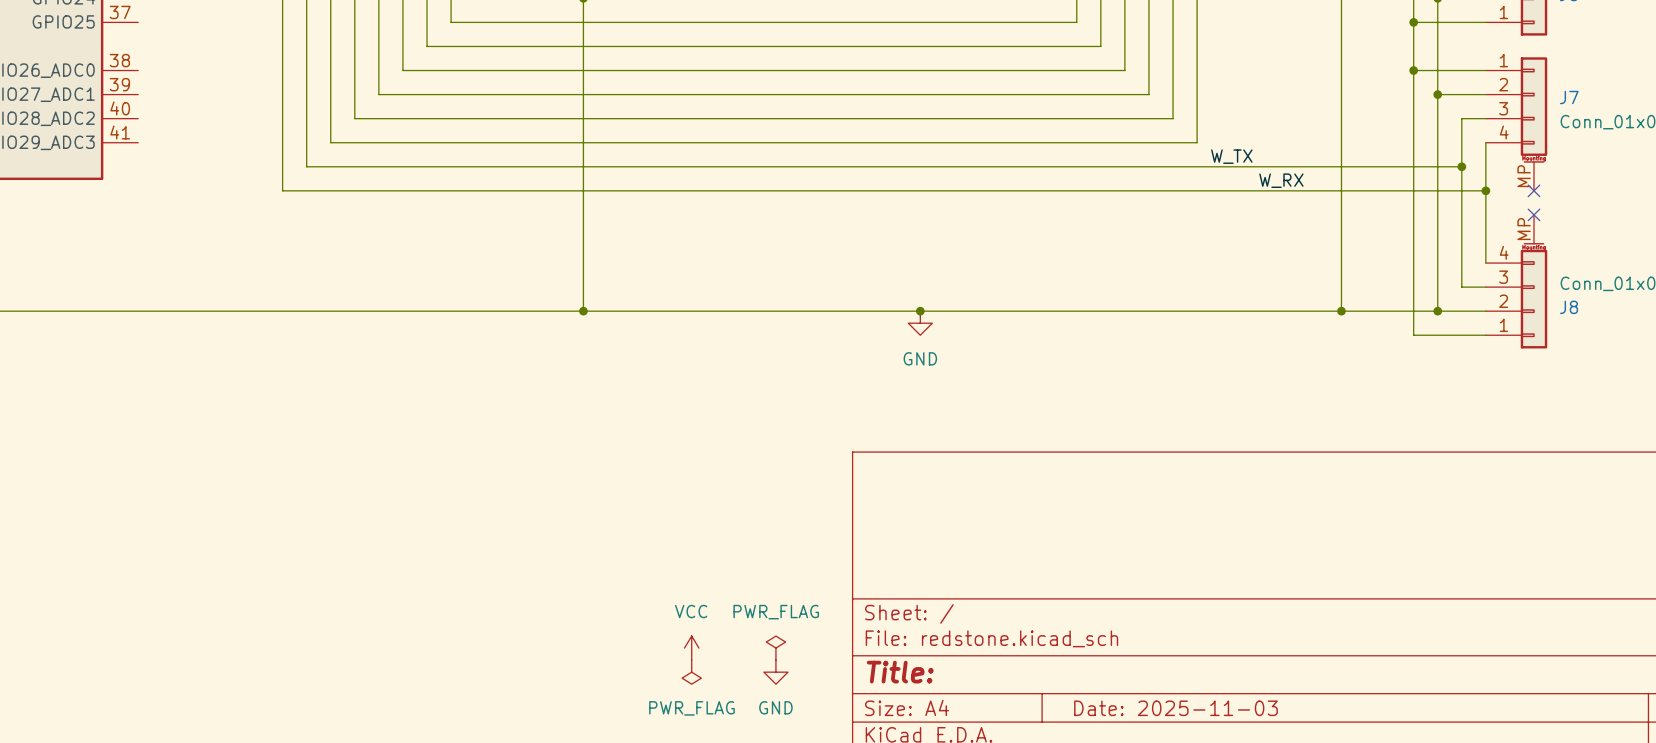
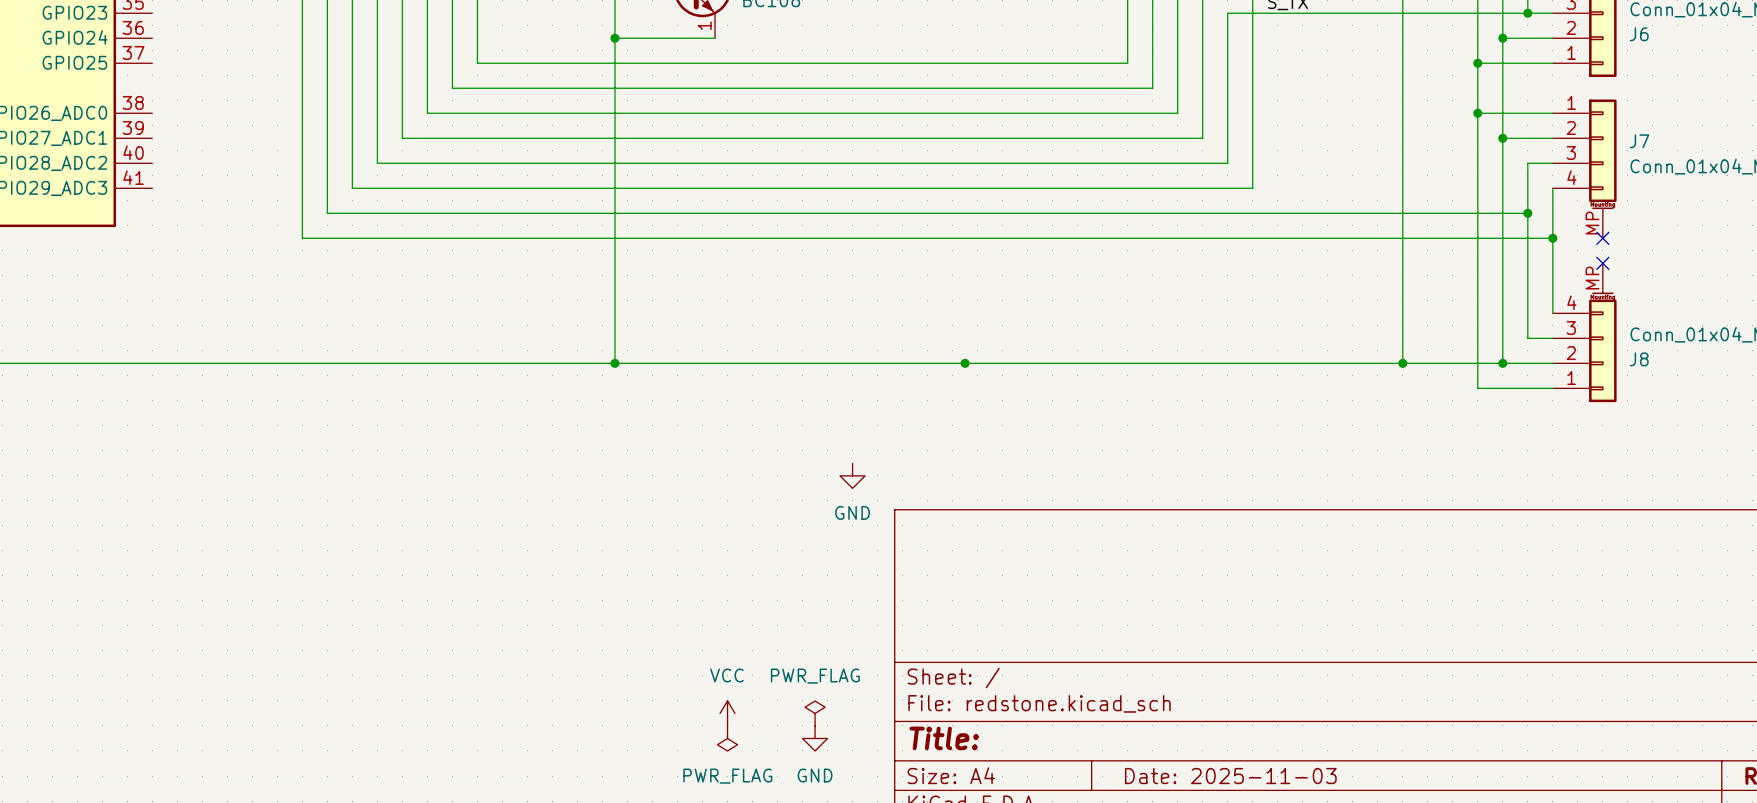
label: W_TX (1231, 156) -> none
label: W_RX (1281, 180) -> none
power symbol position: GND (920, 323) -> GND (852, 475)

